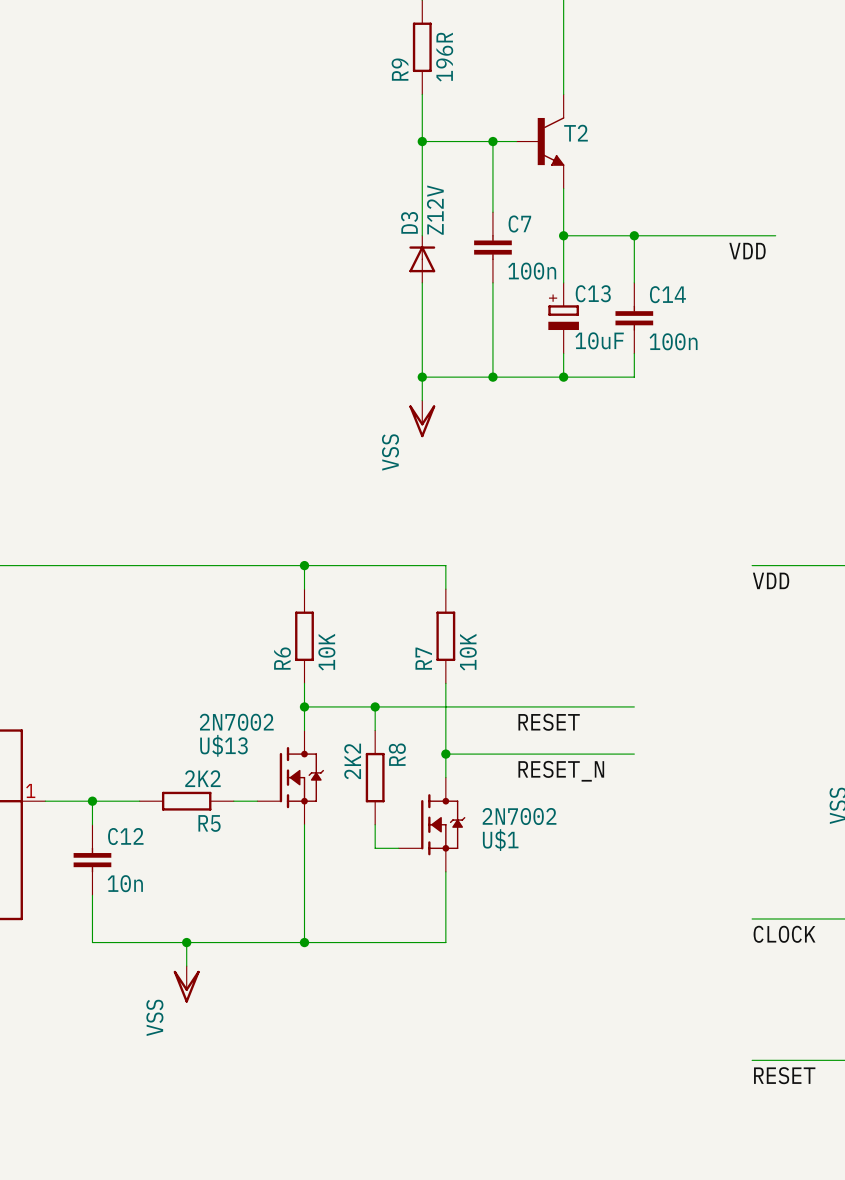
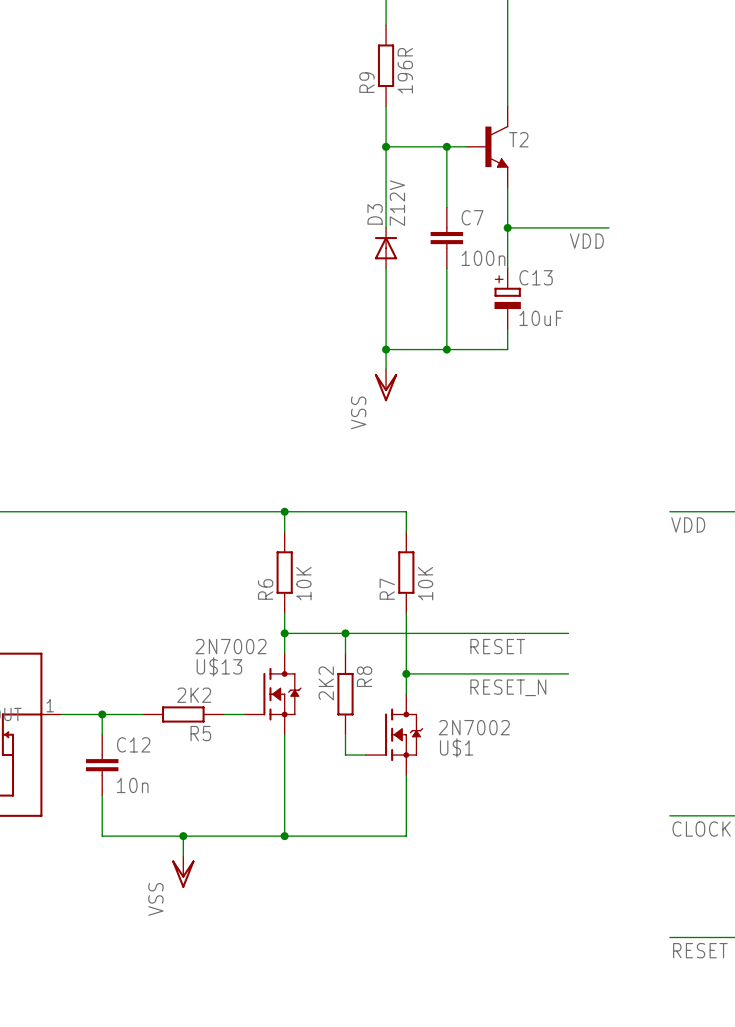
wire: (634, 235) (634, 282) -> none
junction: (634, 235) -> none
wire: (681, 235) (775, 235) -> none
label position: VDD (747, 251) -> VDD (586, 241)
C14: 100n (634, 318) -> none
wire: (634, 353) (634, 377) (563, 377) -> none
junction: (563, 377) -> none

